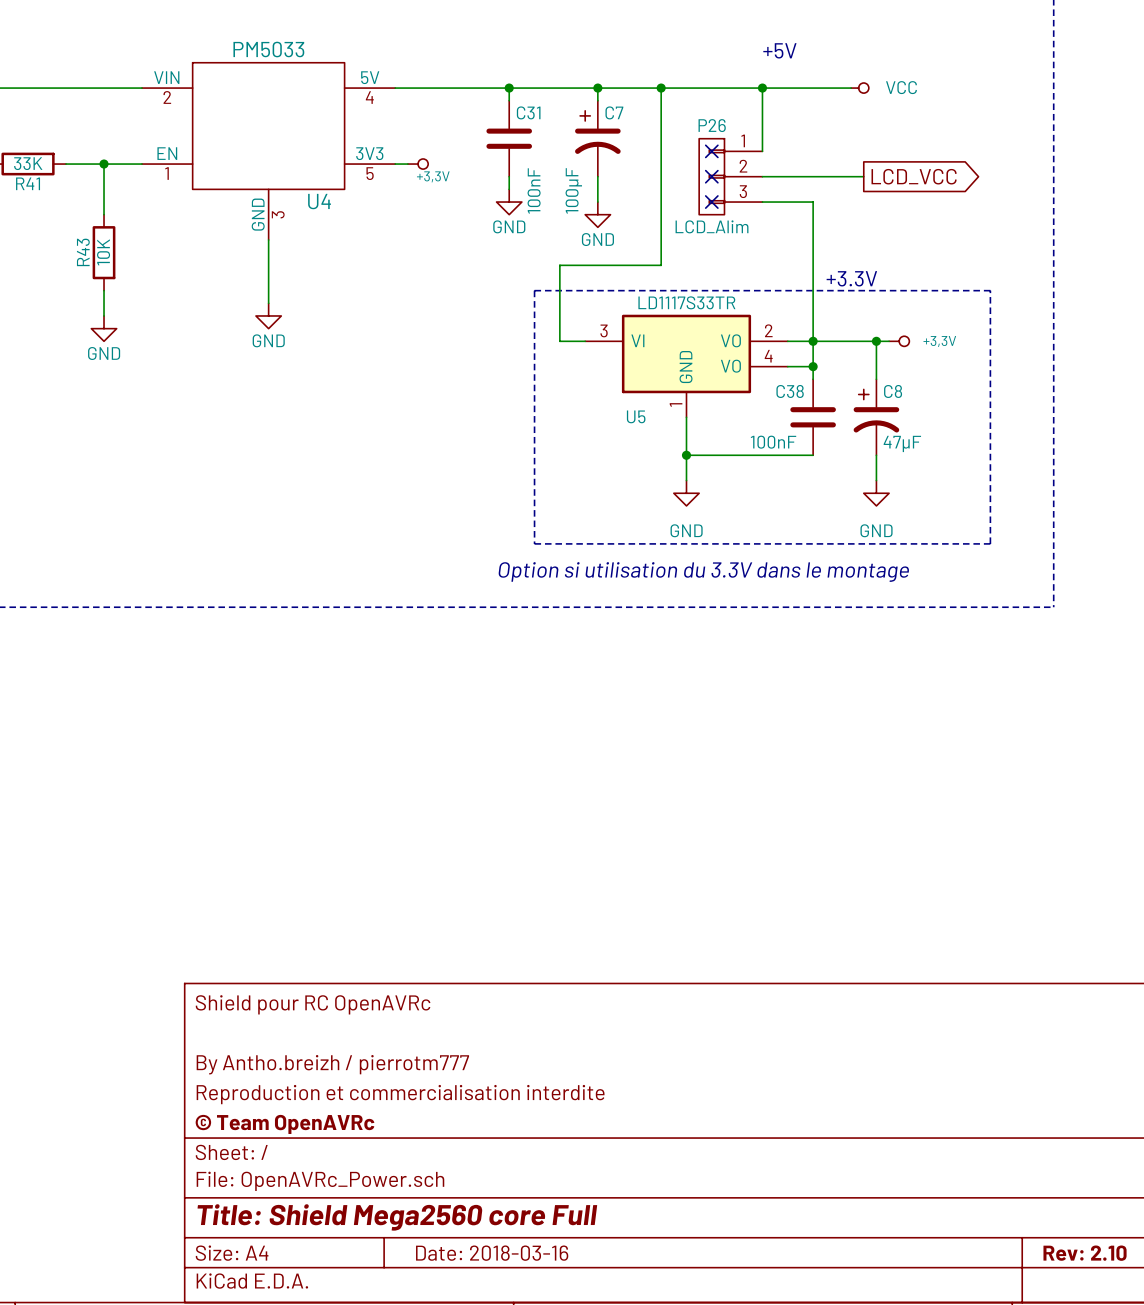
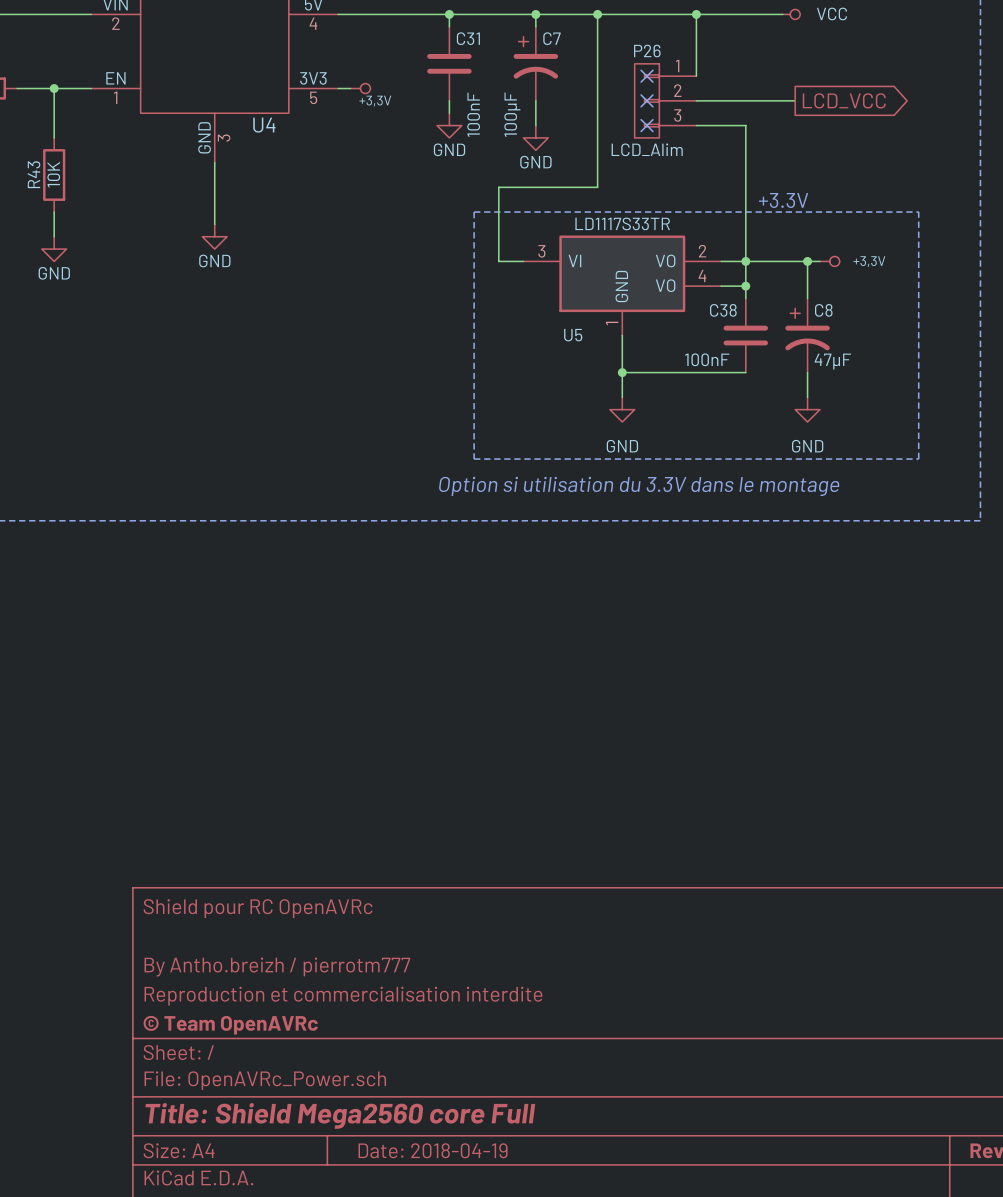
title block: Date: 2018-03-16 (492, 1253) -> Date: 2018-04-19 (433, 1150)

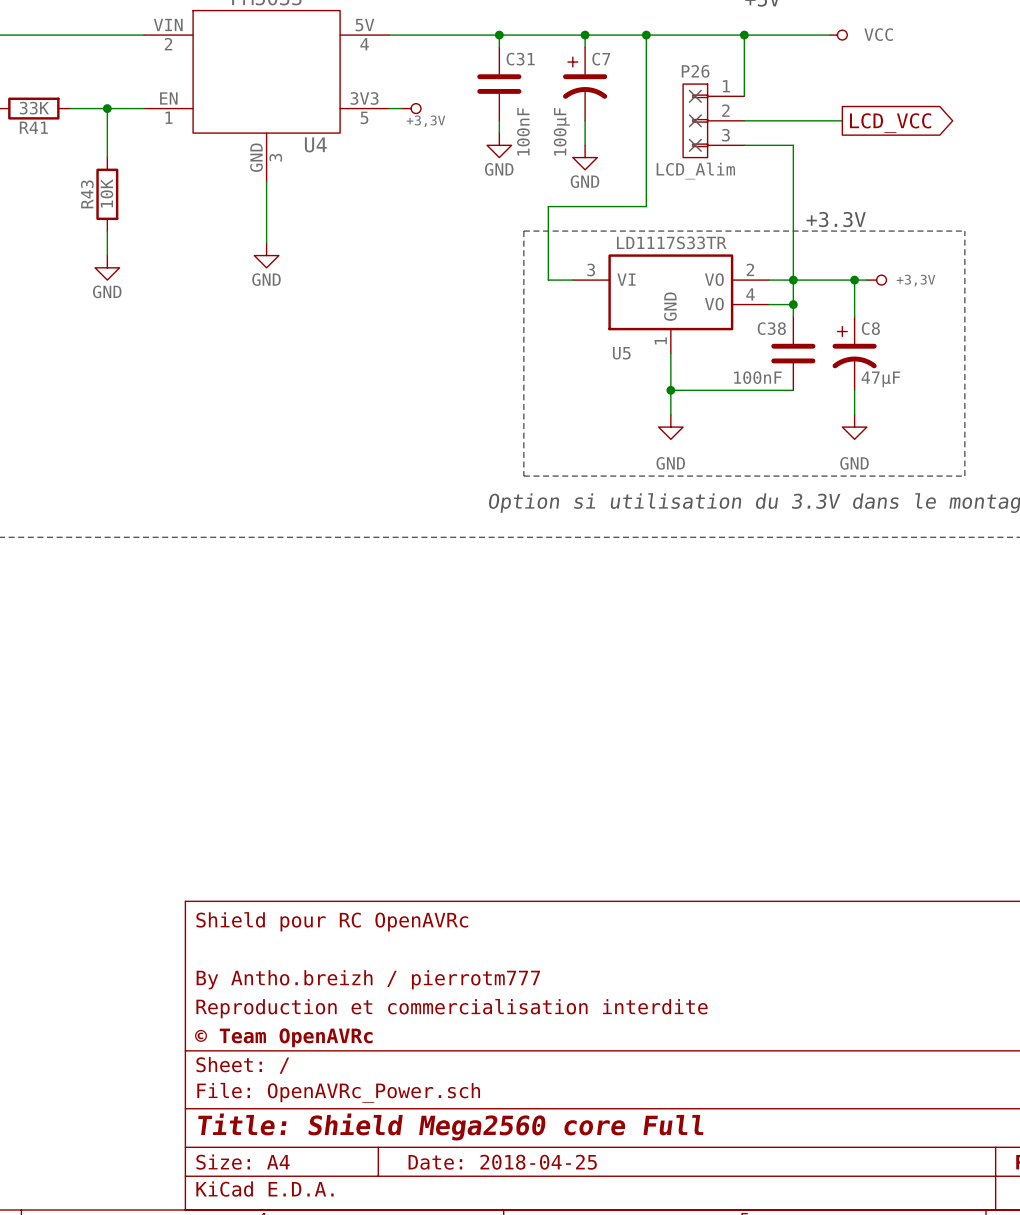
title block: Date: 2018-04-19 (433, 1150) -> Date: 2018-04-25 (502, 1162)

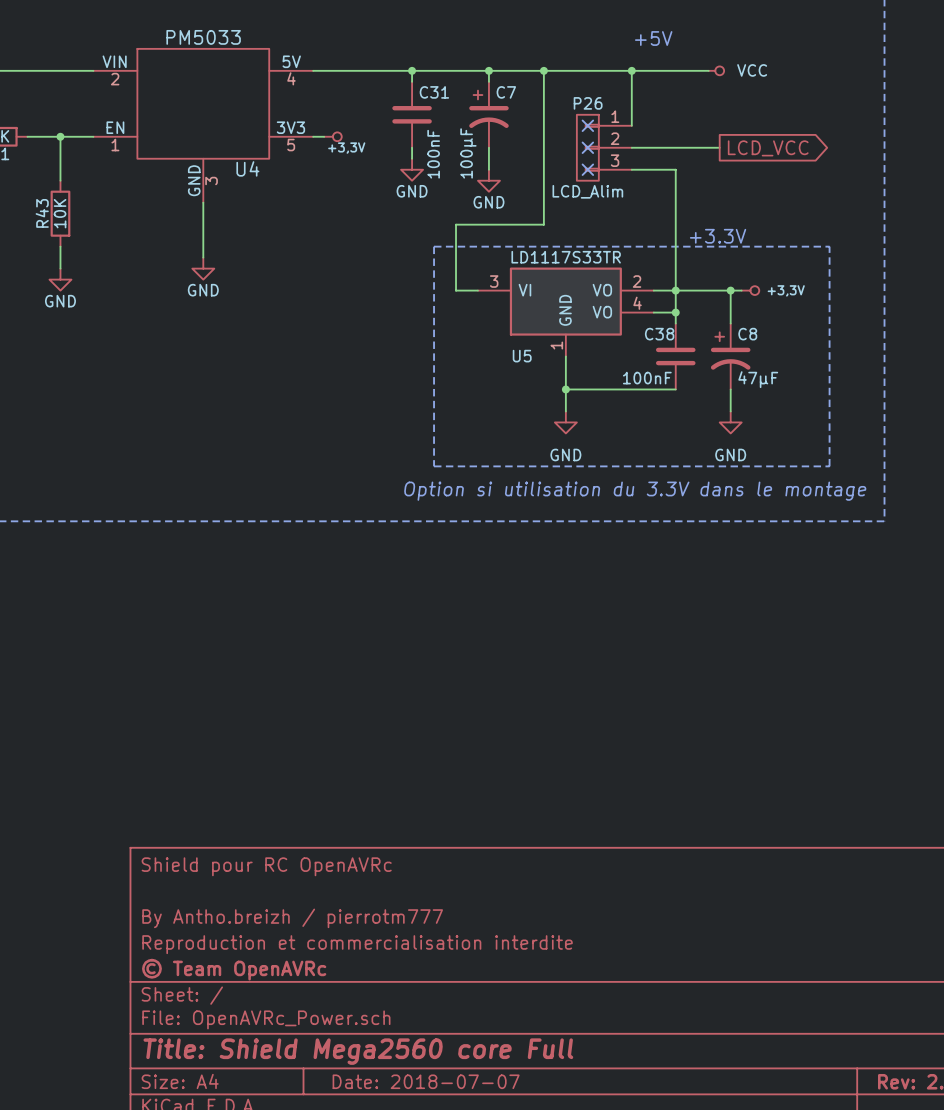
title block: Date: 2018-04-25 (502, 1162) -> Date: 2018-07-07 (426, 1081)

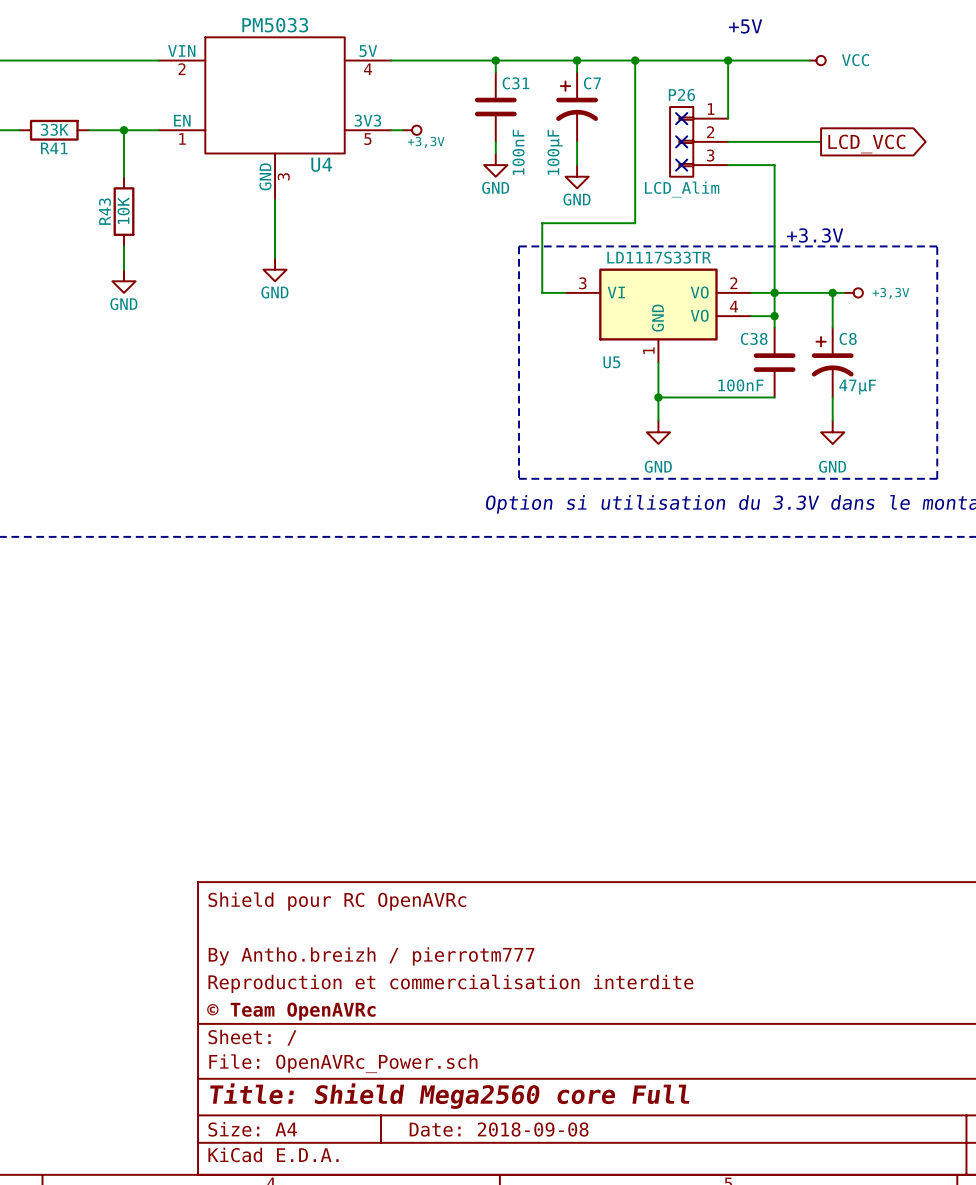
title block: Date: 2018-07-07 (426, 1081) -> Date: 2018-09-08 (499, 1129)

